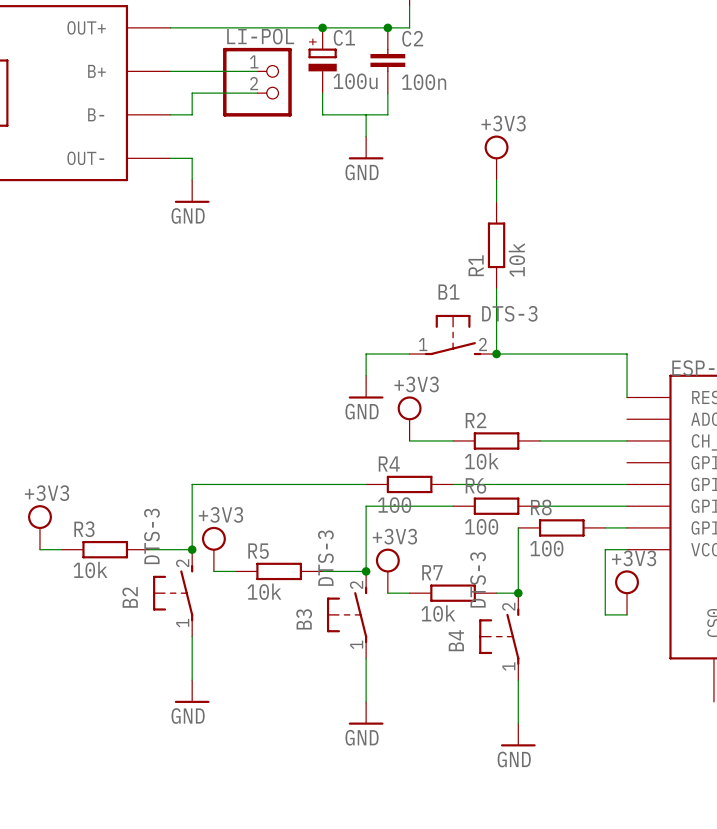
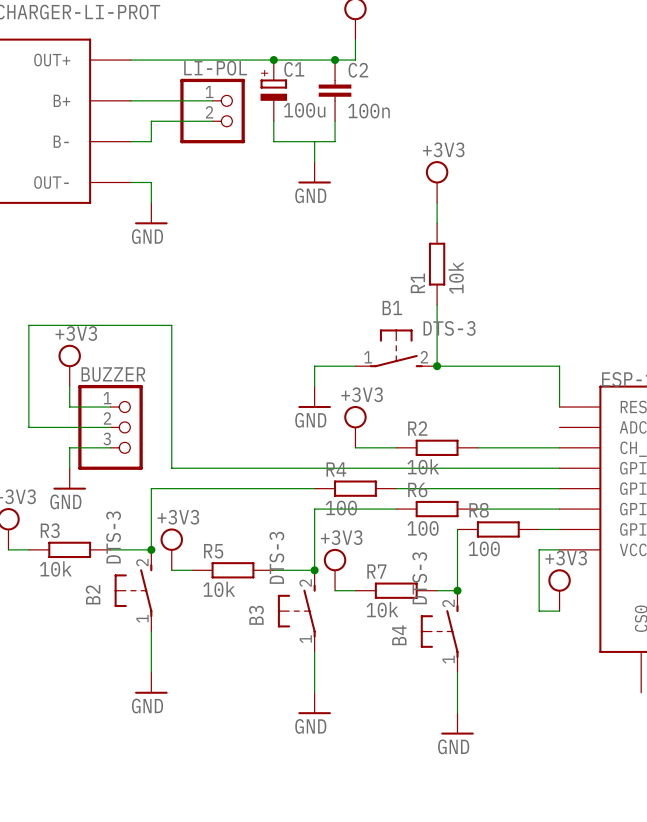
power symbol: none -> +3V3 (69, 365)
wire: none -> (69, 386) (69, 407) (110, 407)
wire: none -> (110, 427) (28, 427) (28, 325) (171, 325) (171, 468) (559, 468)
BUZZER: none -> (110, 427)
wire: none -> (110, 447) (69, 447) (69, 468)
power symbol: none -> GND (69, 478)

